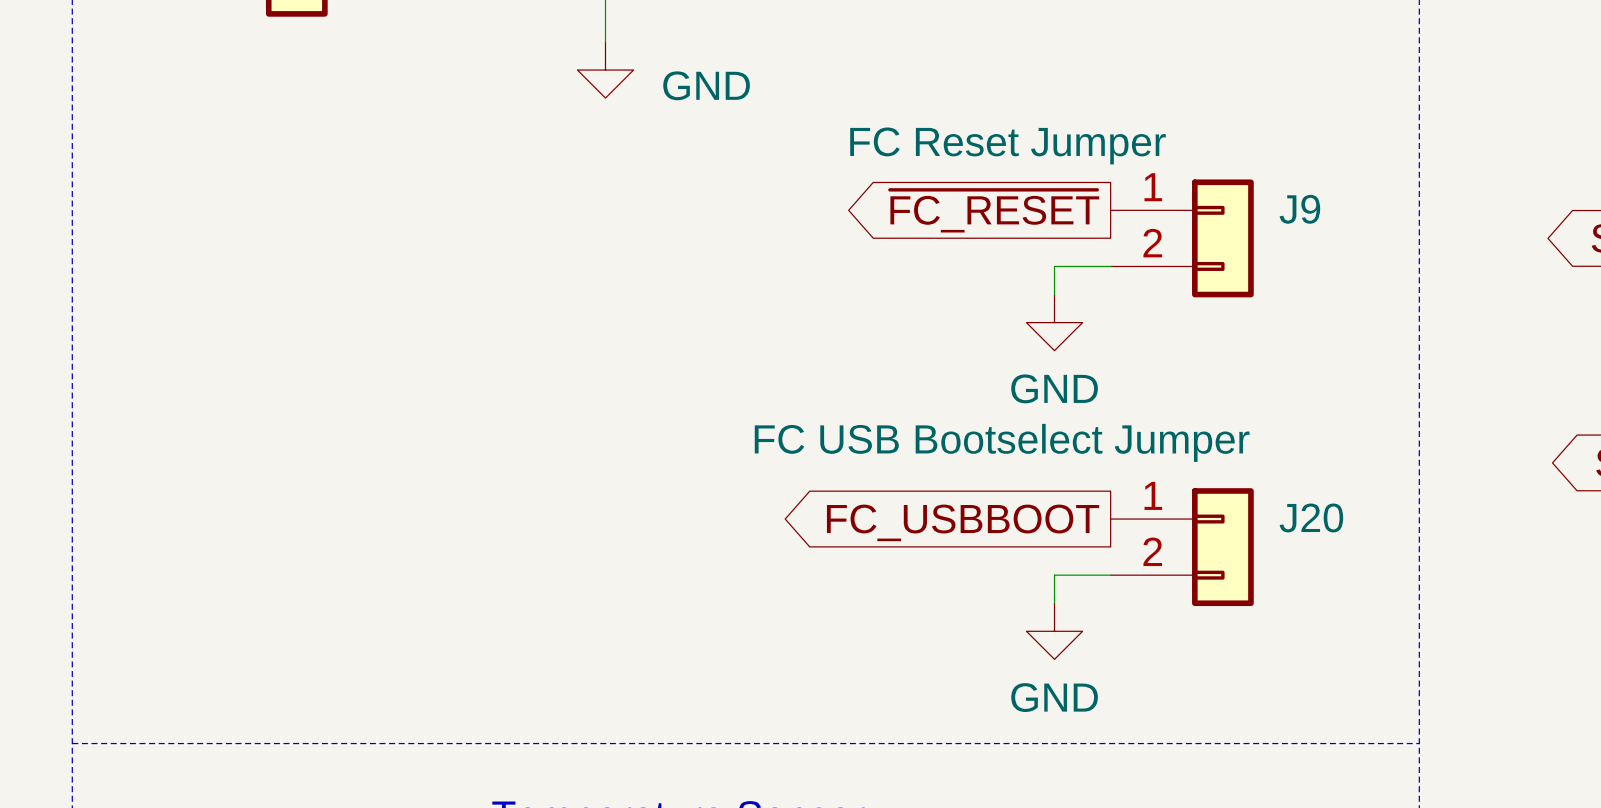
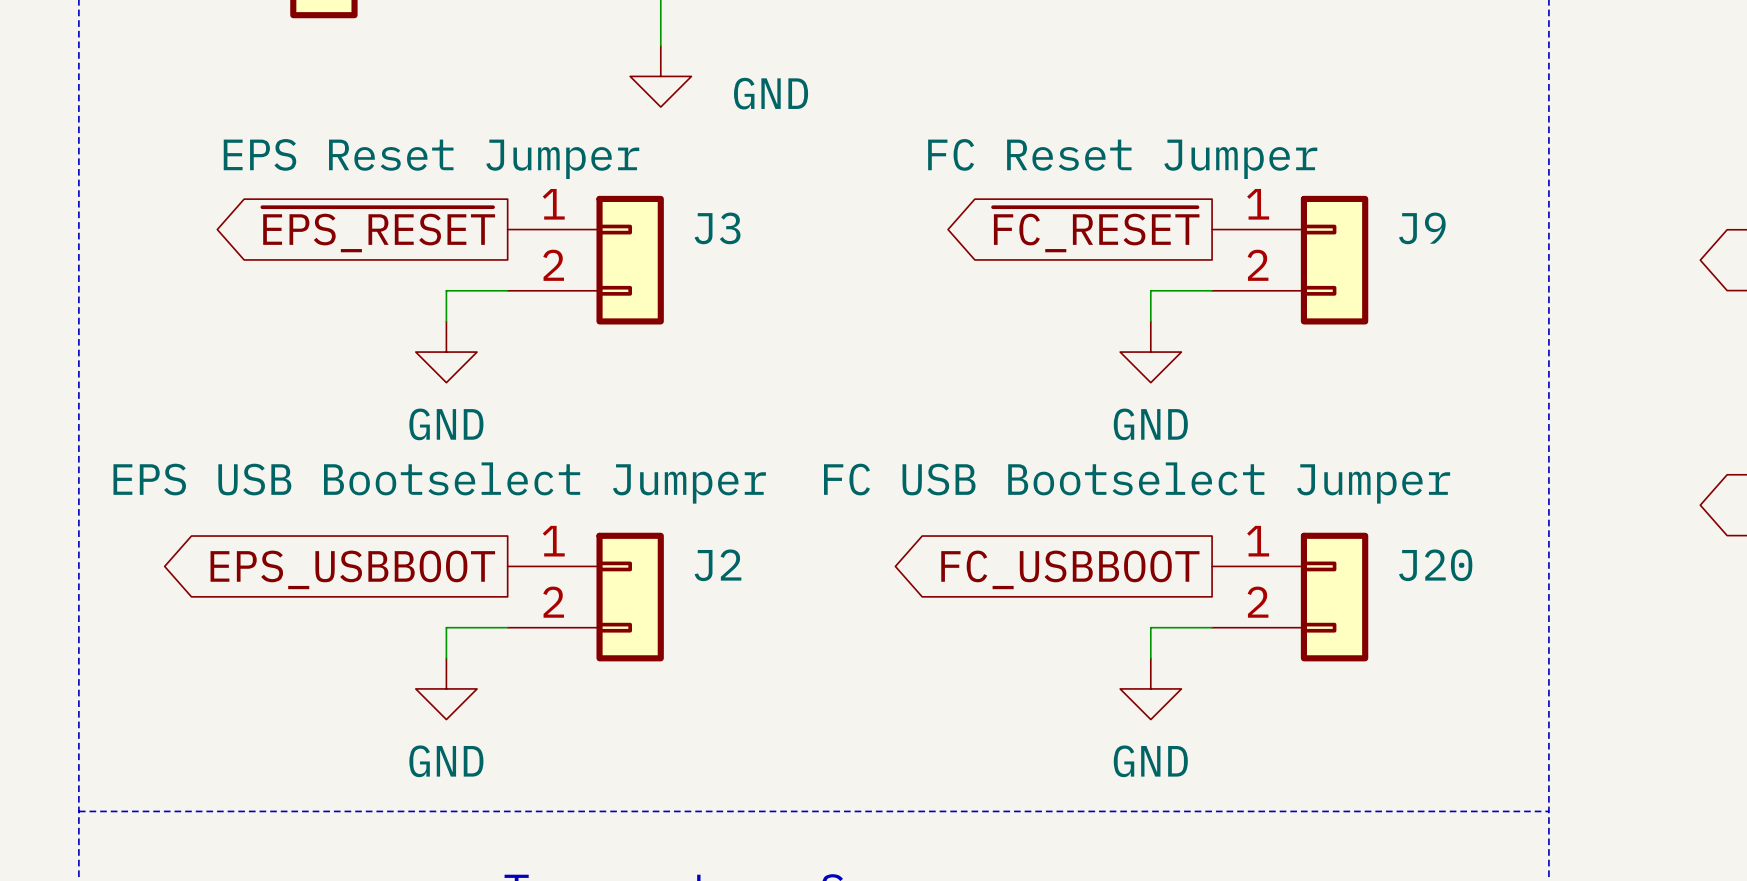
global label: none -> ~{EPS_RESET} (378, 229)
J3: none -> EPS Reset Jumper (585, 260)
wire: none -> (507, 290) (446, 290) (446, 321)
power symbol: none -> GND (446, 352)
global label: none -> EPS_USBBOOT (352, 569)
J2: none -> EPS USB Bootselect Jumper (585, 597)
wire: none -> (507, 627) (446, 627) (446, 658)
power symbol: none -> GND (446, 688)

